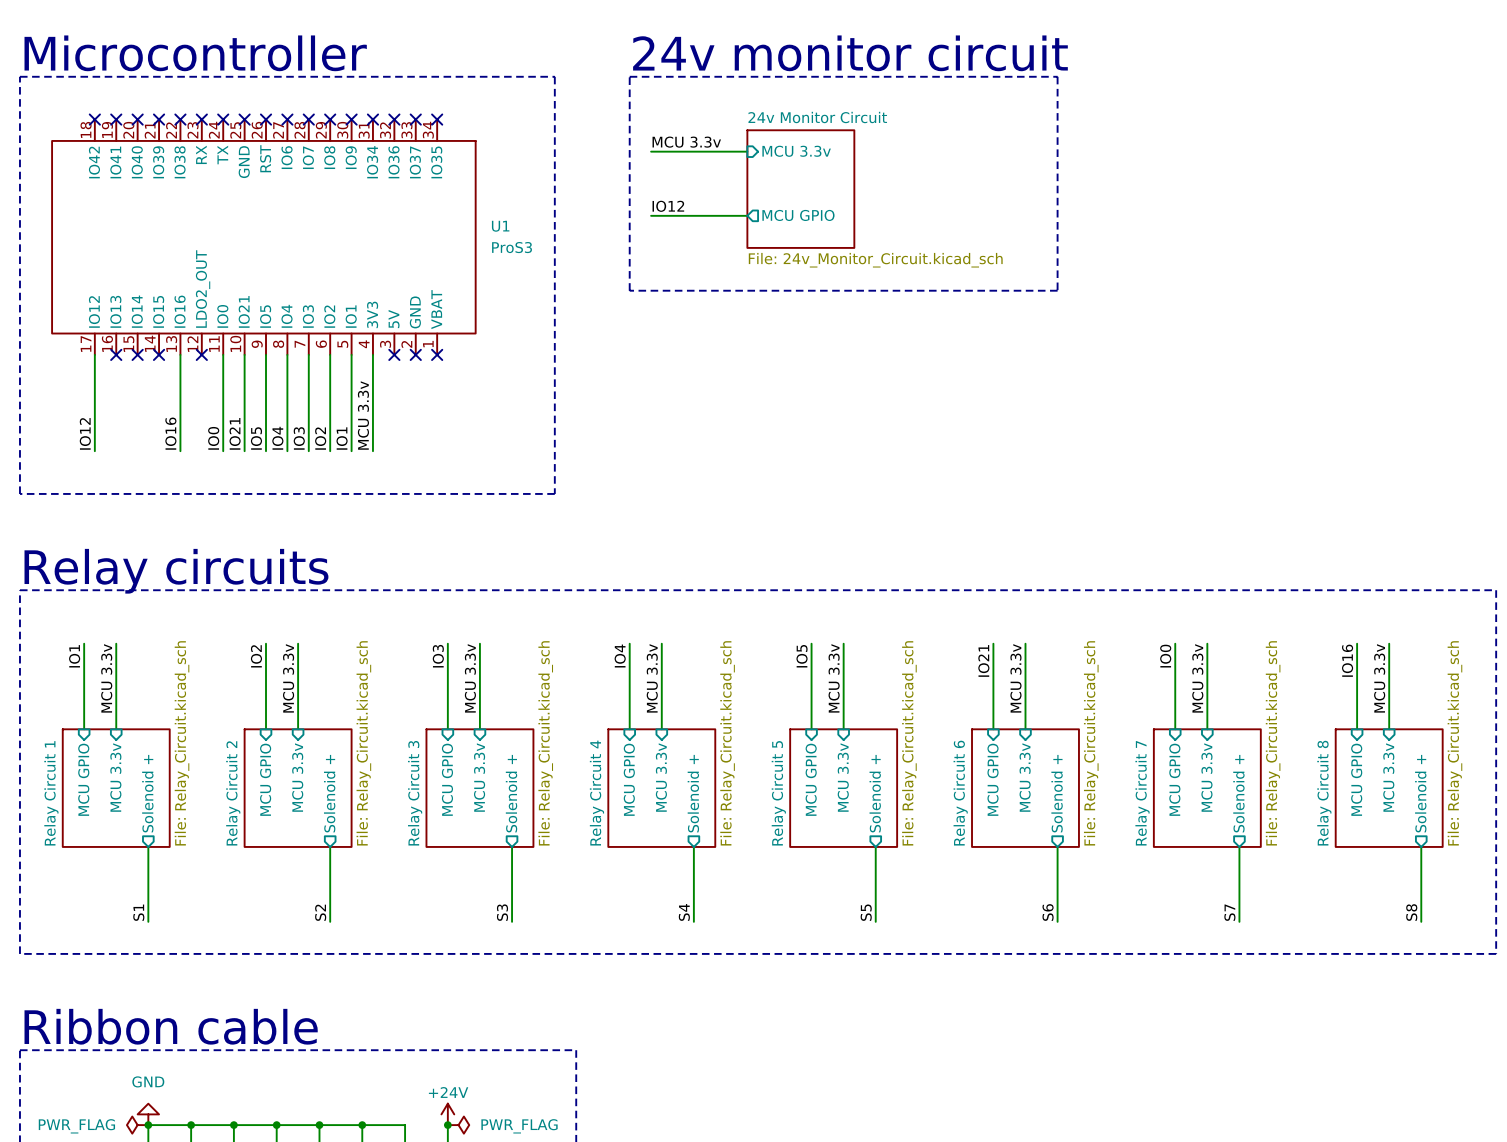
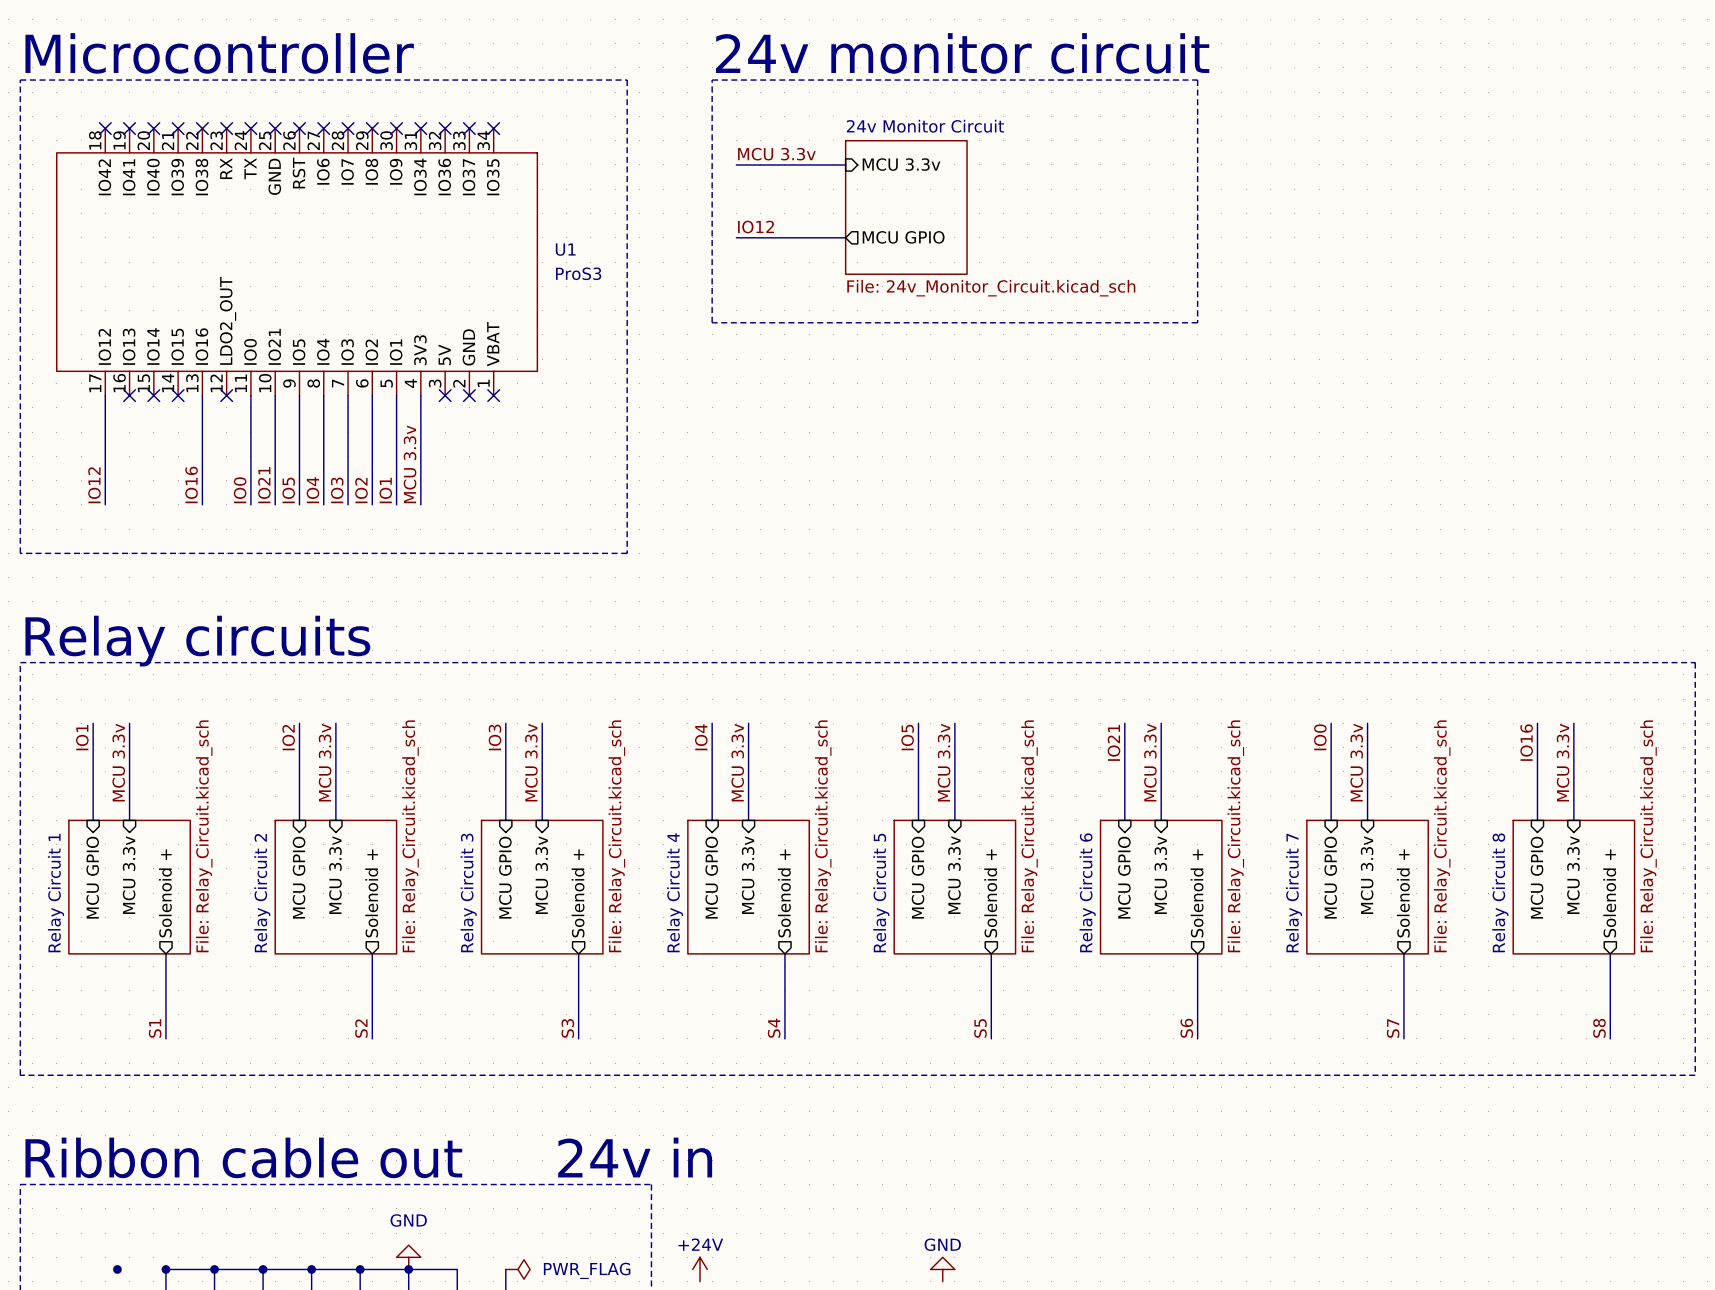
text: Ribbon cable (171, 1026) -> Ribbon cable out (243, 1157)
text: none -> 24v in (635, 1157)
power symbol: GND (148, 1114) -> none
power symbol: none -> GND (408, 1257)
power symbol position: +24V (447, 1114) -> +24V (700, 1269)
junction: none -> (117, 1269)
power symbol: PWR_FLAG (137, 1125) -> none
junction: (447, 1125) -> none
power symbol: none -> GND (942, 1269)

